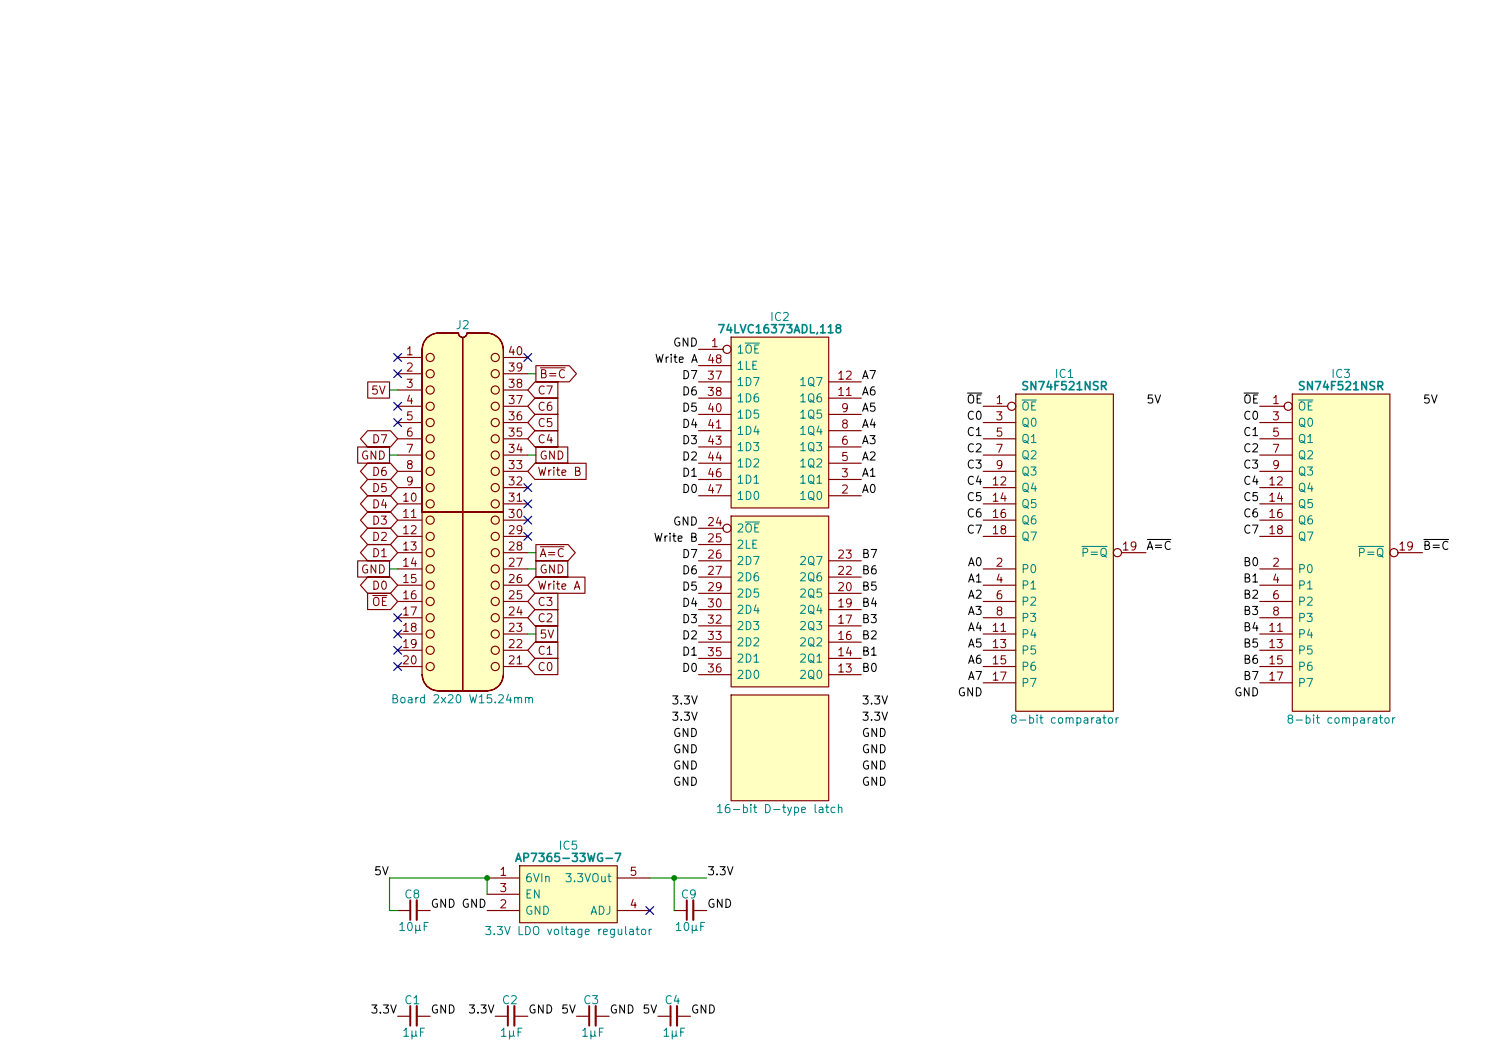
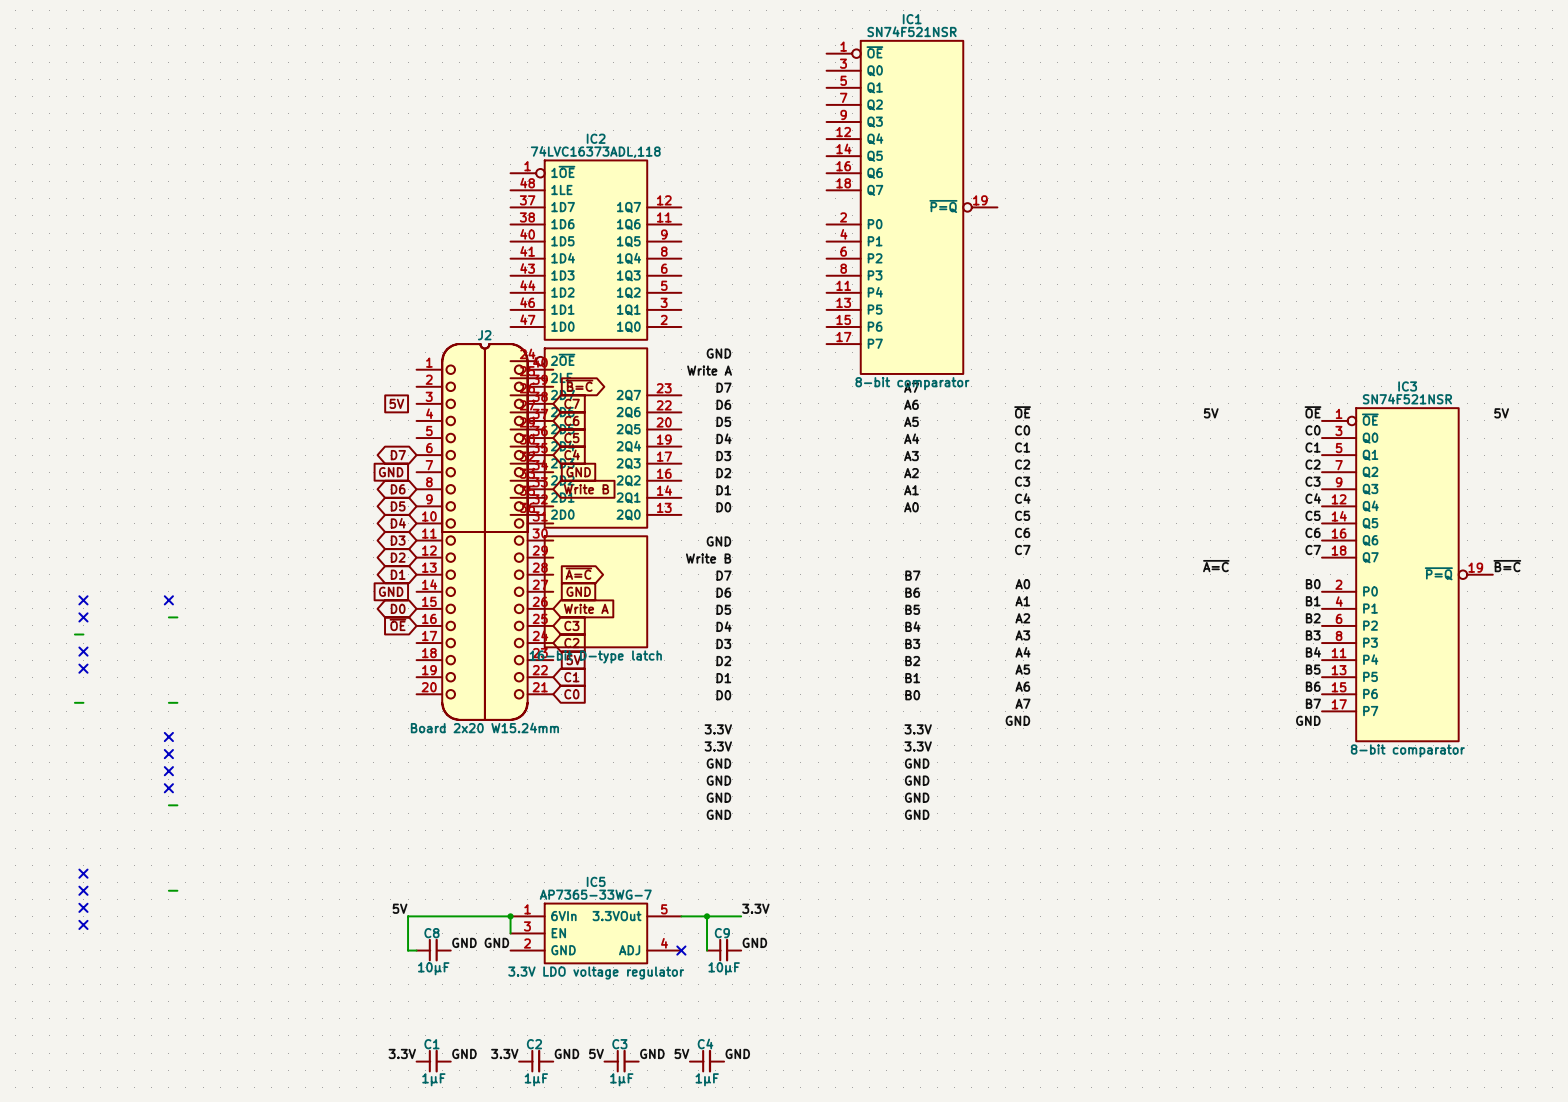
no-connect mark: (397, 357) -> none
no-connect mark: (527, 357) -> none
no-connect mark: (397, 373) -> none
wire: (389, 390) (397, 390) -> none
no-connect mark: (397, 406) -> none
no-connect mark: (397, 422) -> none
wire: (389, 455) (397, 455) -> none
no-connect mark: (527, 487) -> none
no-connect mark: (527, 503) -> none
no-connect mark: (527, 520) -> none
no-connect mark: (527, 536) -> none
IC1 position: (1064, 552) -> (912, 207)
wire: (389, 568) (397, 568) -> none
IC2 position: (779, 568) -> (595, 403)
no-connect mark: none -> (83, 600)
no-connect mark: none -> (168, 600)
no-connect mark: none -> (83, 617)
wire: none -> (168, 617) (177, 617)
wire: none -> (74, 634) (83, 634)
no-connect mark: (397, 617) -> none
no-connect mark: none -> (83, 651)
no-connect mark: (397, 634) -> none
no-connect mark: none -> (83, 668)
no-connect mark: (397, 650) -> none
no-connect mark: (397, 666) -> none
wire: none -> (74, 702) (83, 702)
wire: none -> (168, 702) (177, 702)
no-connect mark: none -> (168, 737)
no-connect mark: none -> (168, 754)
no-connect mark: none -> (168, 771)
no-connect mark: none -> (168, 788)
wire: none -> (168, 805) (177, 805)
no-connect mark: none -> (83, 873)
no-connect mark: none -> (83, 890)
wire: none -> (168, 890) (177, 890)
no-connect mark: none -> (83, 907)
no-connect mark: none -> (83, 924)

